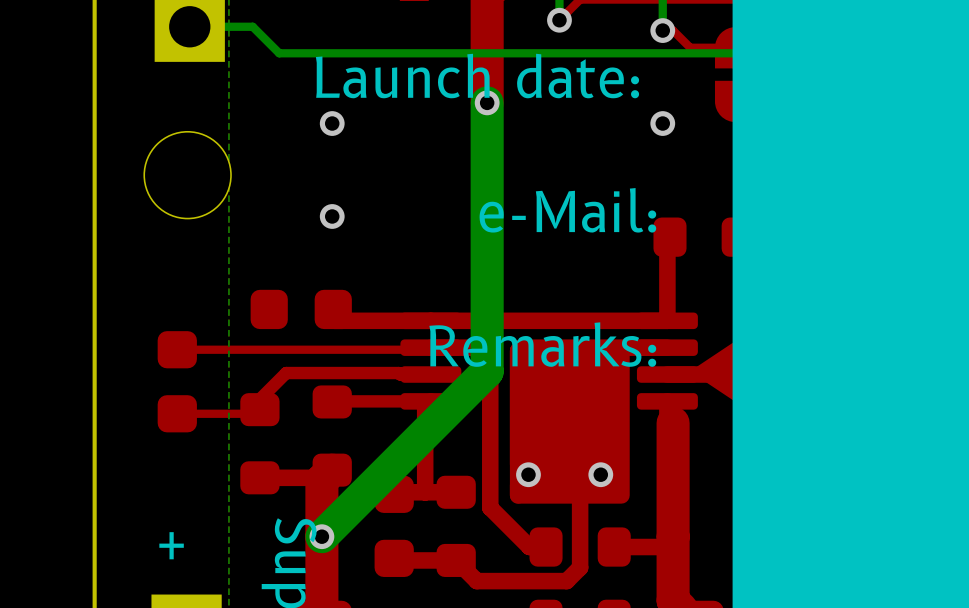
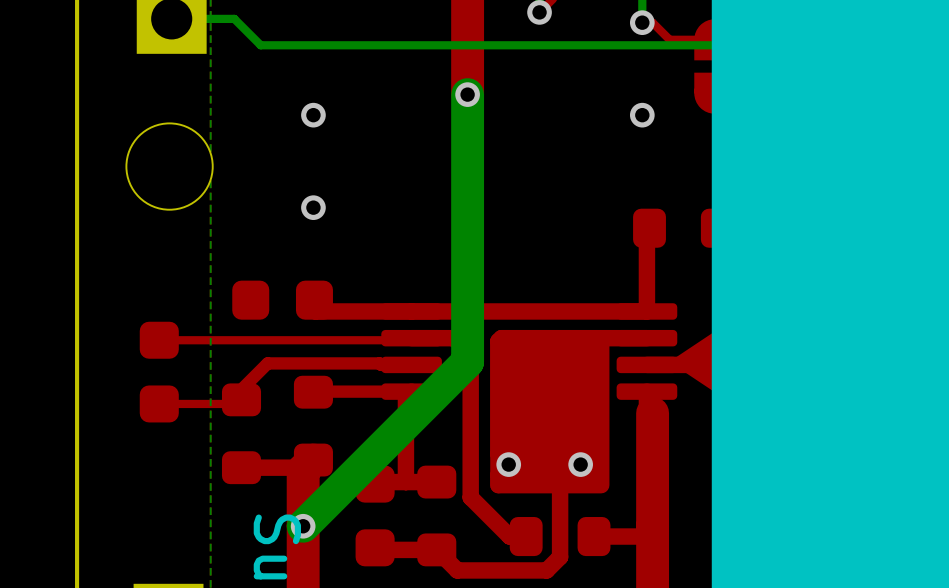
text: Launch date: (477, 76) -> none
text: e-Mail: (567, 210) -> none
text: Remarks: (542, 344) -> none
text: + (171, 545) -> none

